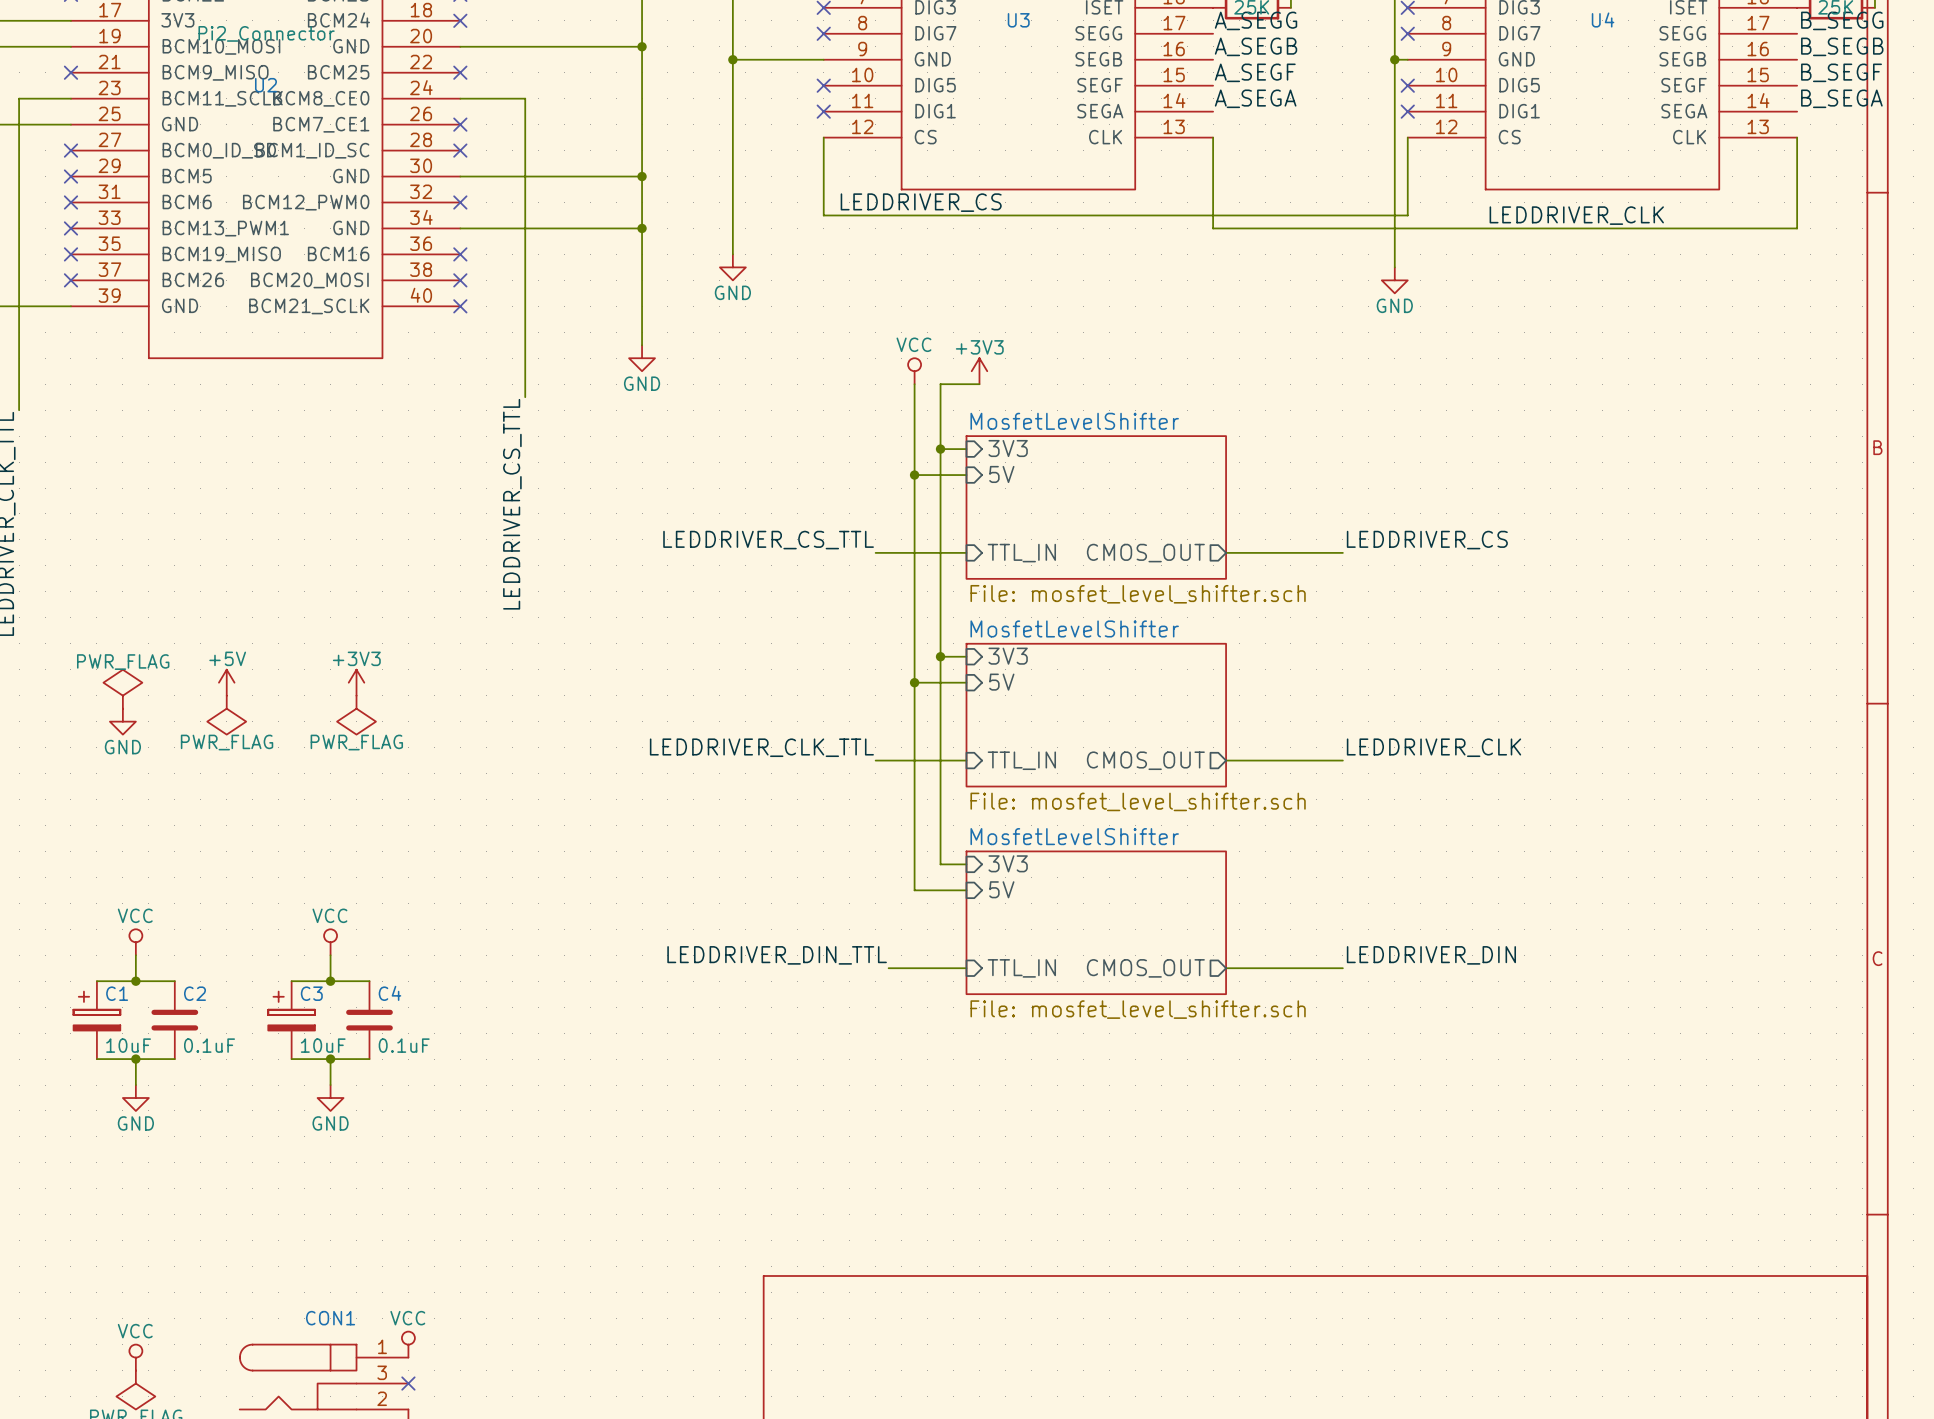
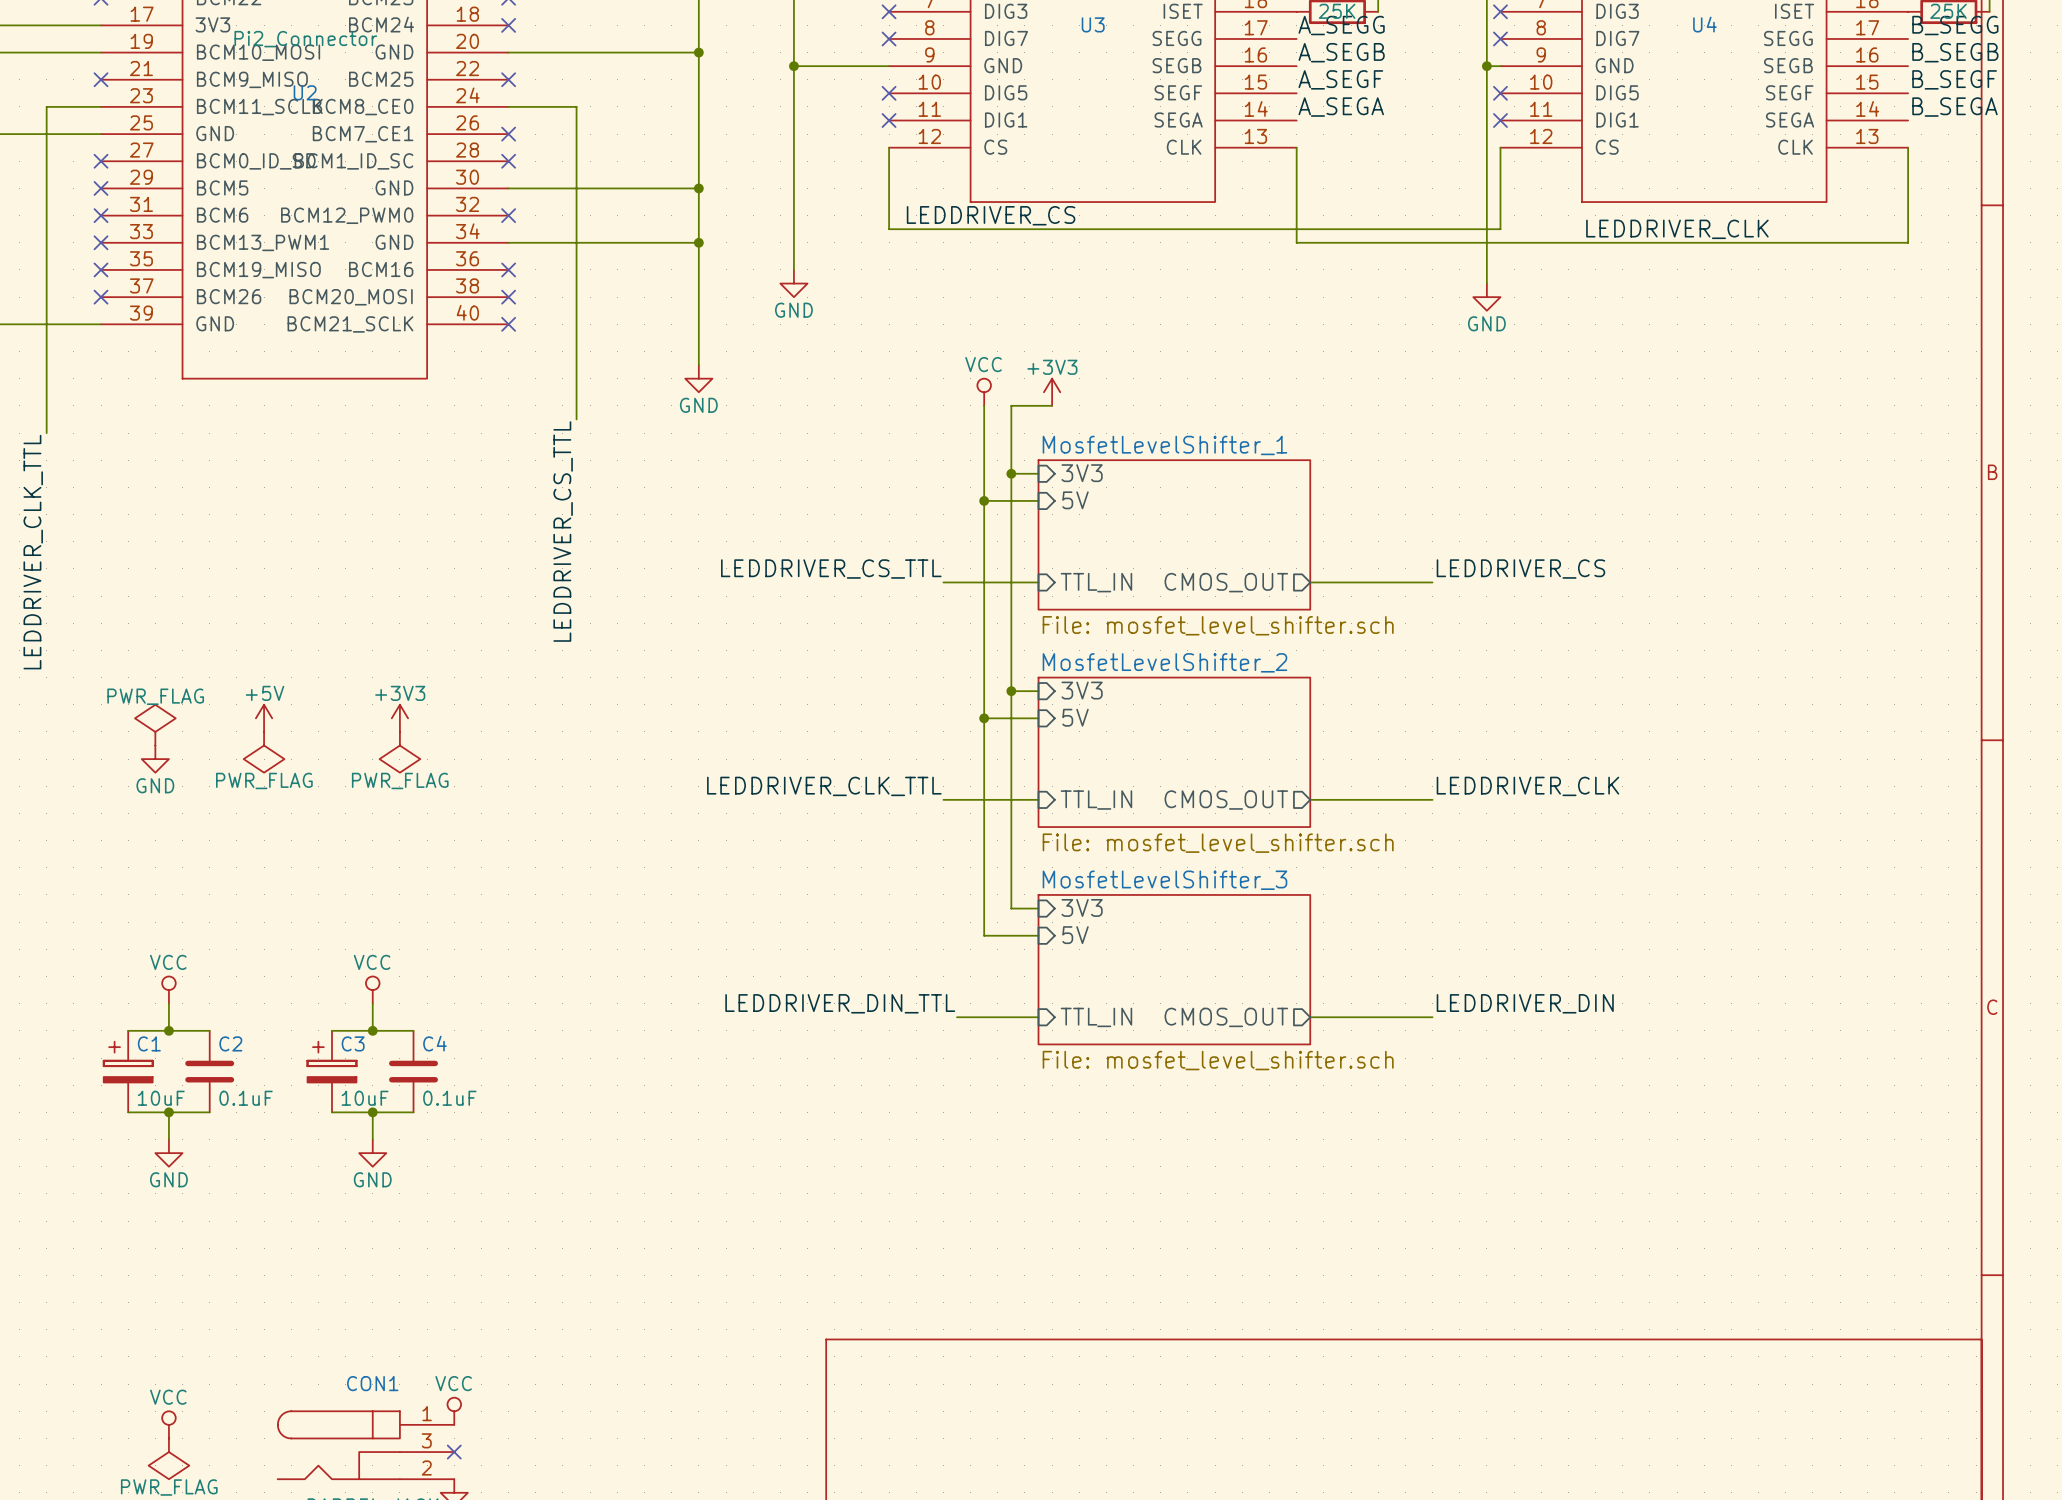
sheet MosfetLevelShifter name: MosfetLevelShifter (1074, 421) -> MosfetLevelShifter_1 (1164, 445)
sheet MosfetLevelShifter name: MosfetLevelShifter (1074, 628) -> MosfetLevelShifter_2 (1164, 662)
sheet MosfetLevelShifter name: MosfetLevelShifter (1074, 836) -> MosfetLevelShifter_3 (1164, 880)

